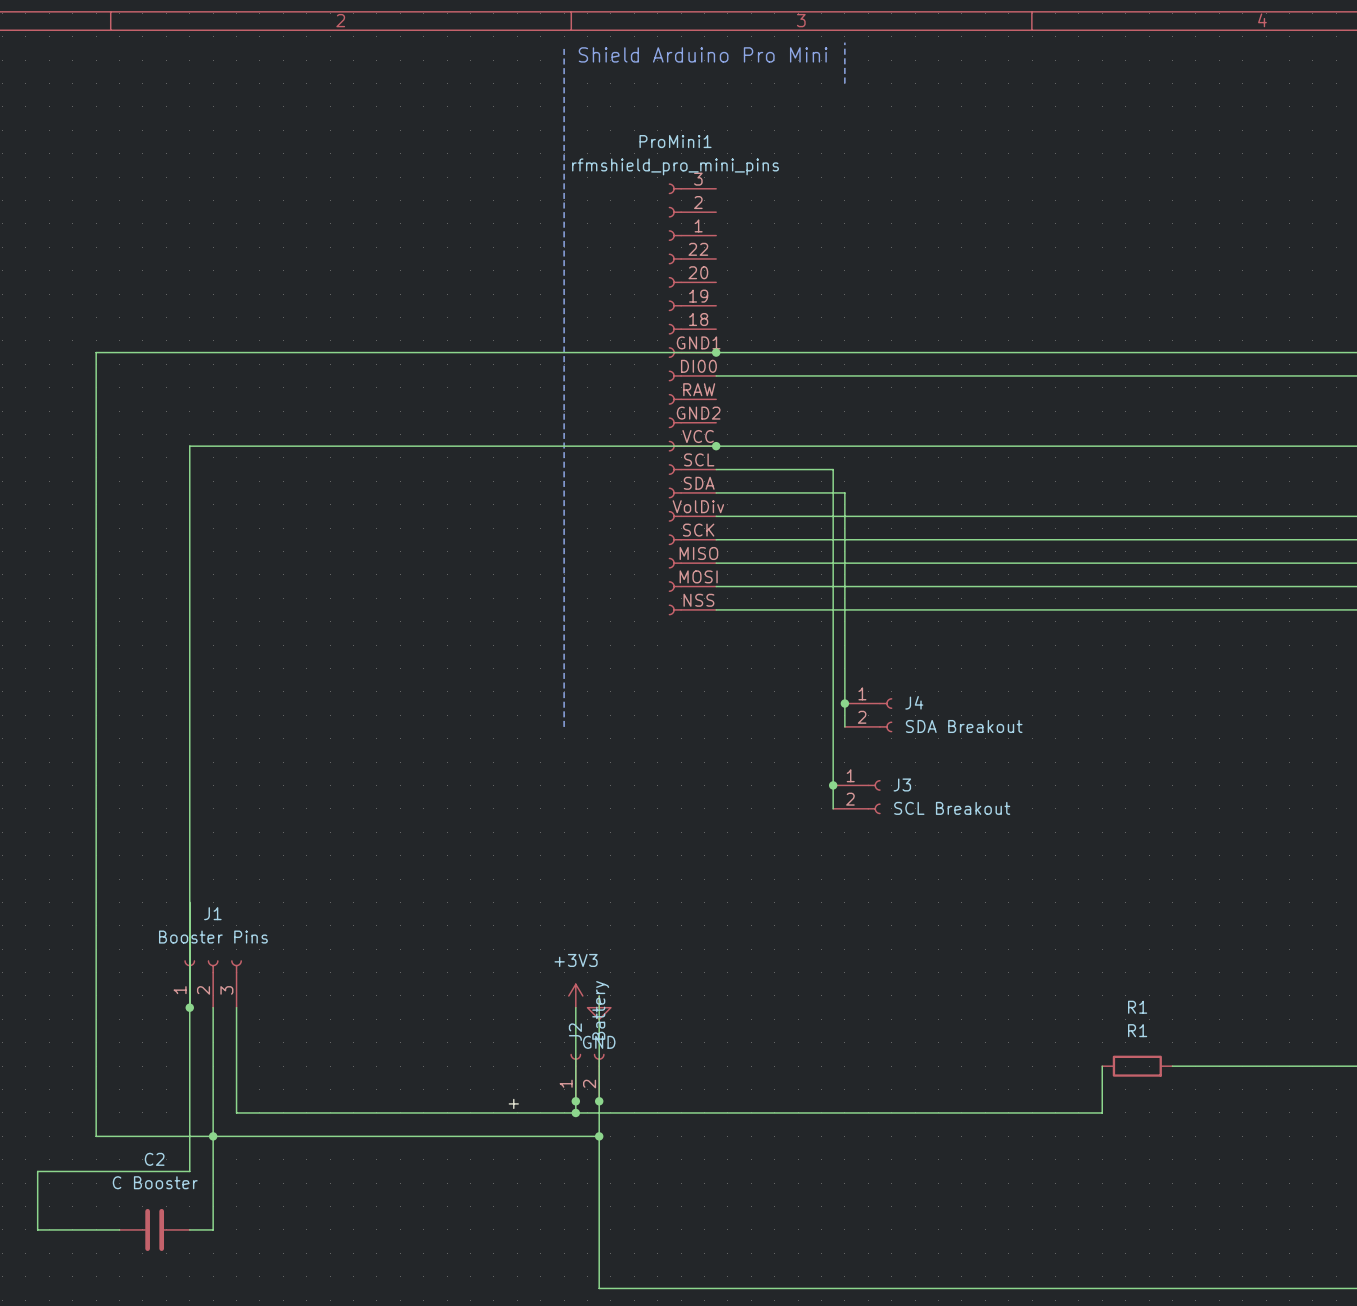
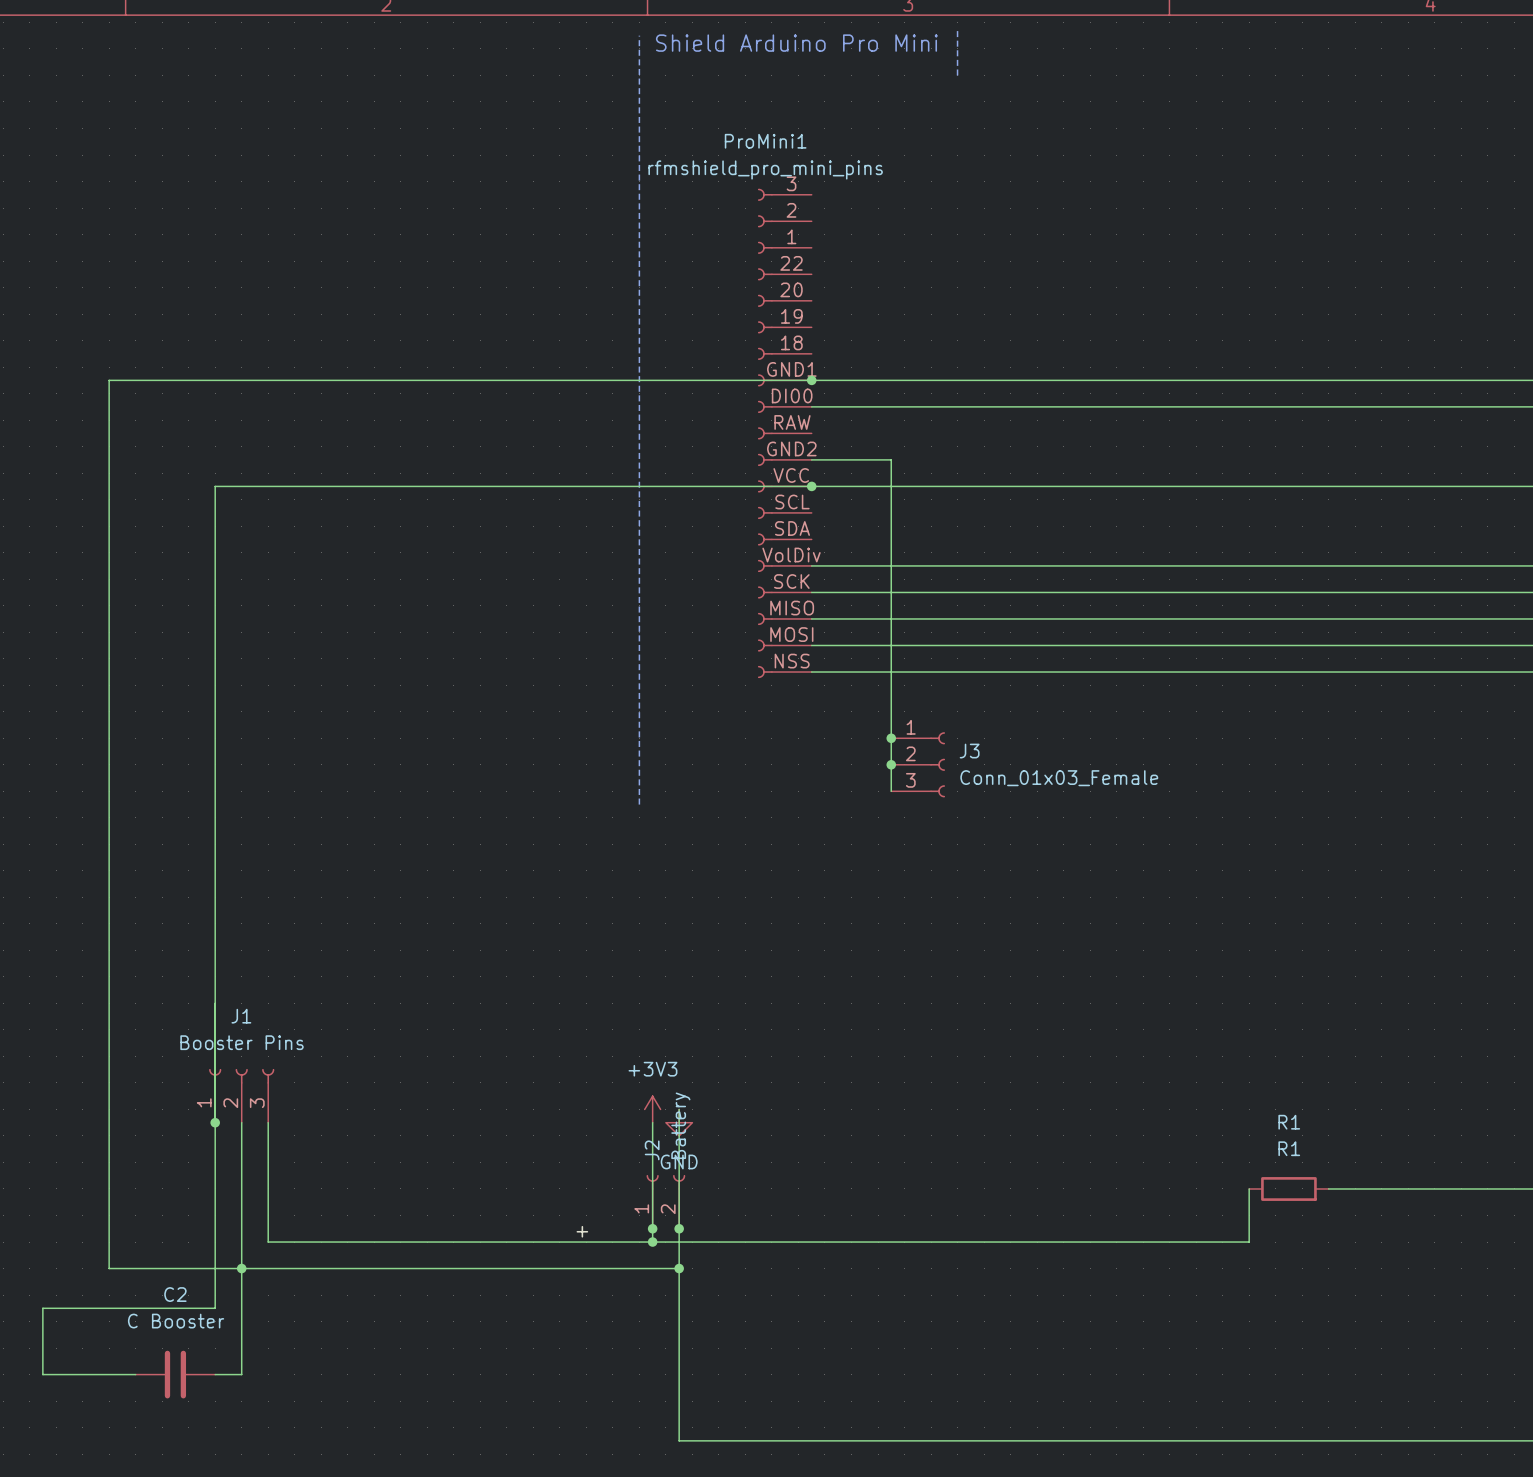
wire: none -> (811, 459) (891, 459) (891, 791)
wire: (716, 469) (833, 469) (833, 808) -> none
wire: (716, 492) (844, 492) (844, 726) -> none
junction: none -> (891, 738)
junction: none -> (891, 764)
junction: (844, 703) -> none
J4: SDA Breakout (868, 715) -> none
J3 symbol: [833, 780, 881, 815] -> [891, 732, 946, 798]
junction: (833, 785) -> none
J3 value: SCL Breakout (952, 808) -> Conn_01x03_Female (1059, 778)

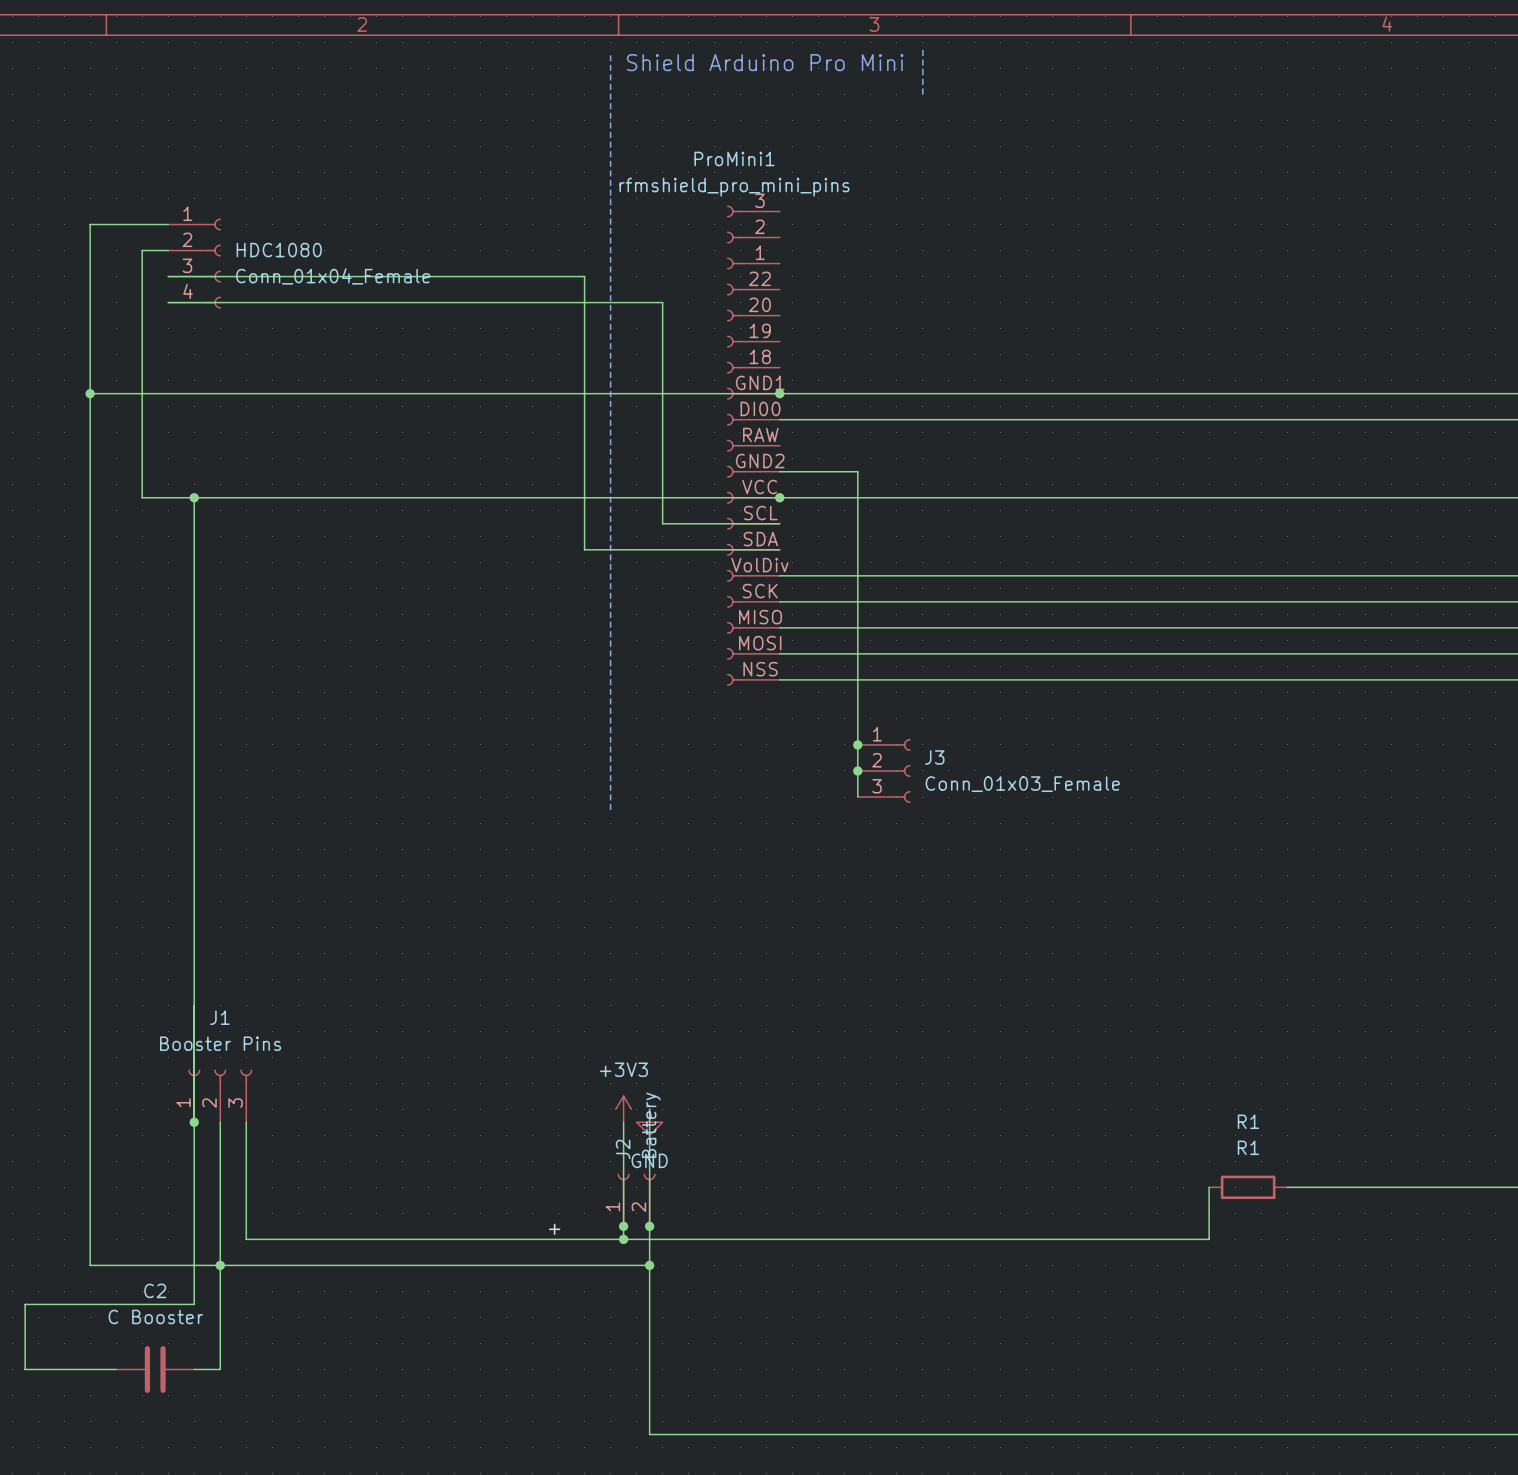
wire: none -> (168, 224) (90, 224) (90, 393)
wire: none -> (168, 250) (142, 250) (142, 497) (194, 497)
HDC1080: none -> Conn_01x04_Female (194, 263)
wire: none -> (168, 276) (584, 276) (584, 549) (779, 549)
wire: none -> (168, 302) (662, 302) (662, 523) (779, 523)
junction: none -> (90, 393)
junction: none -> (194, 497)

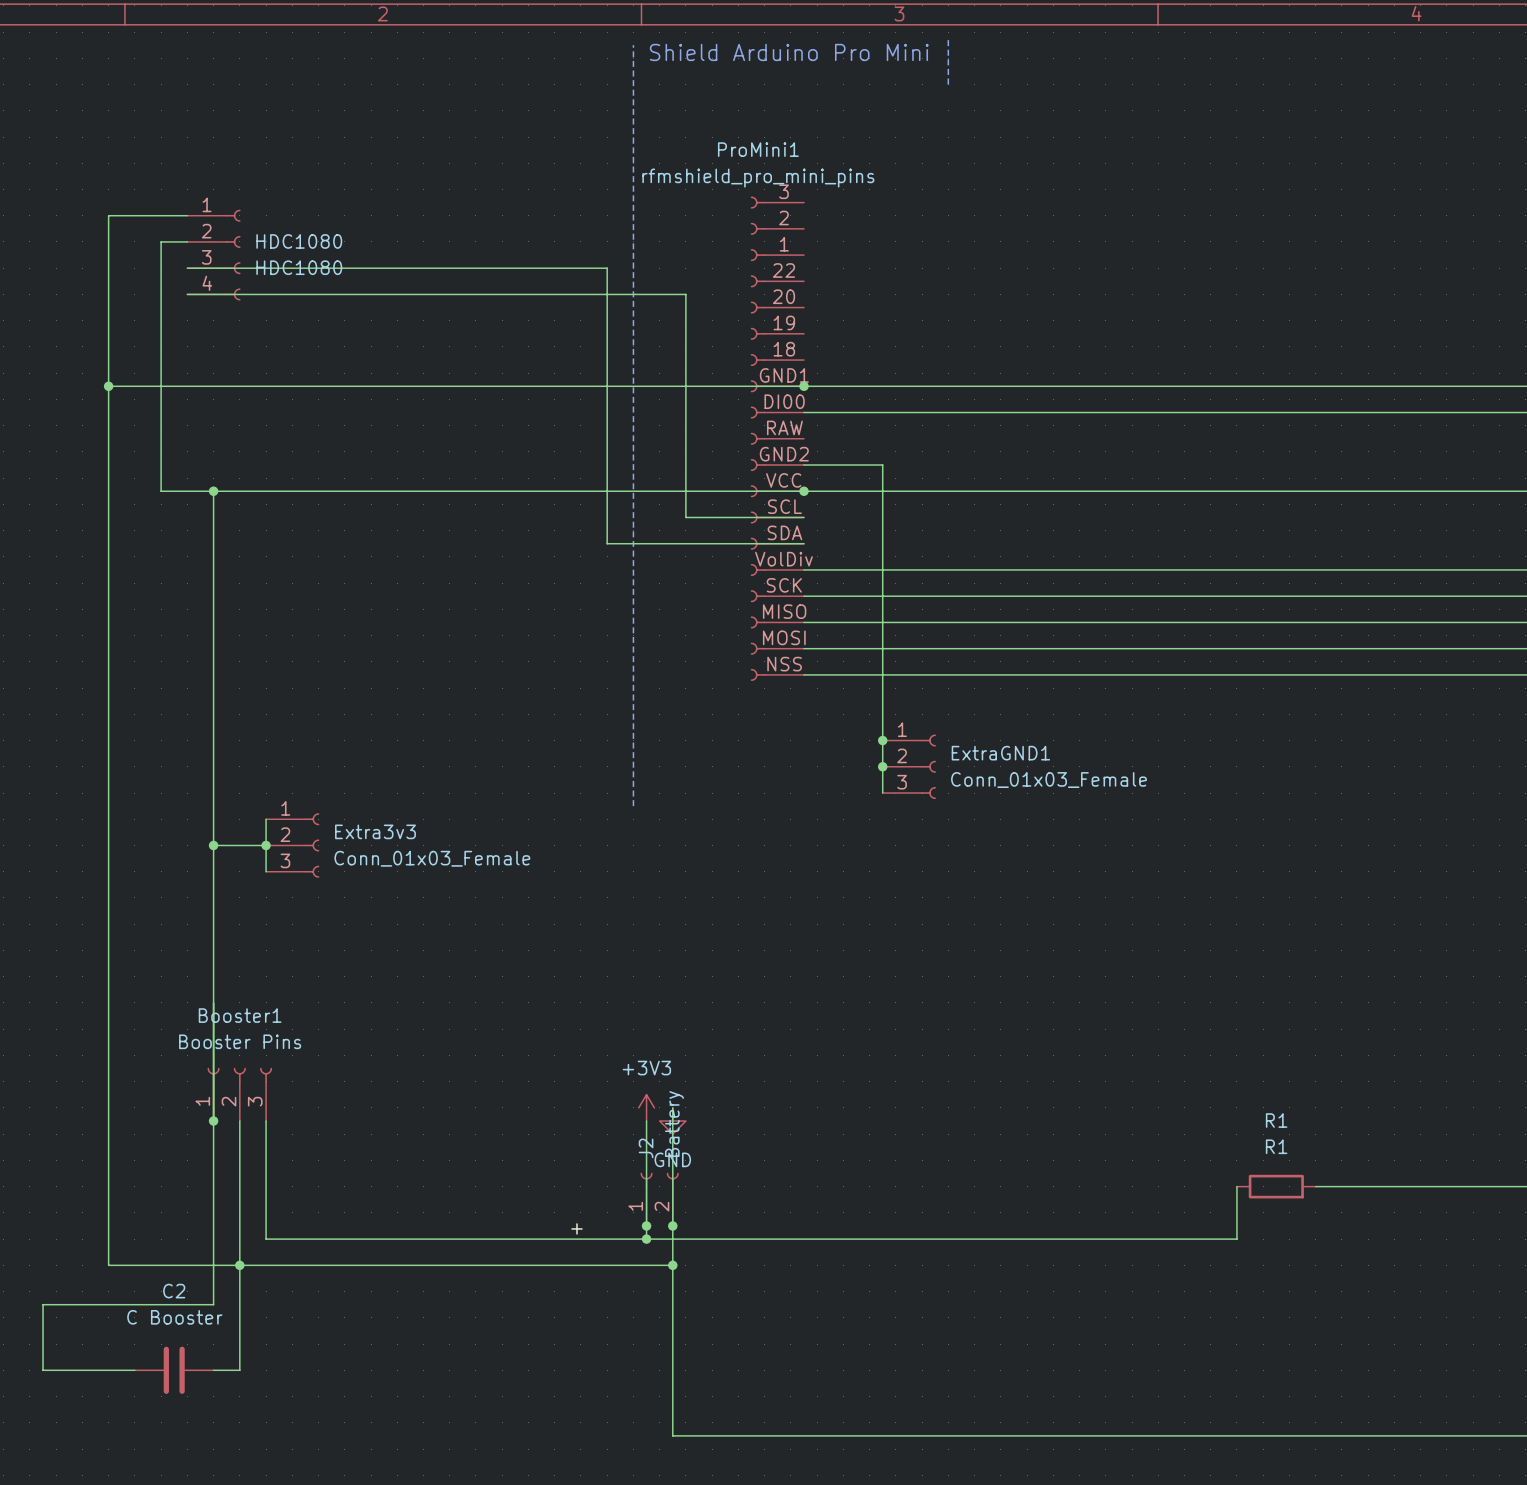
HDC1080 value: Conn_01x04_Female (333, 276) -> HDC1080 (299, 267)
J3 name: J3 (934, 757) -> ExtraGND1 (1000, 753)
wire: none -> (266, 819) (266, 871)
wire: none -> (213, 845) (266, 845)
junction: none -> (213, 845)
junction: none -> (266, 845)
Extra3v3: none -> Conn_01x03_Female (292, 845)
J1 name: J1 (219, 1017) -> Booster1 (240, 1015)

